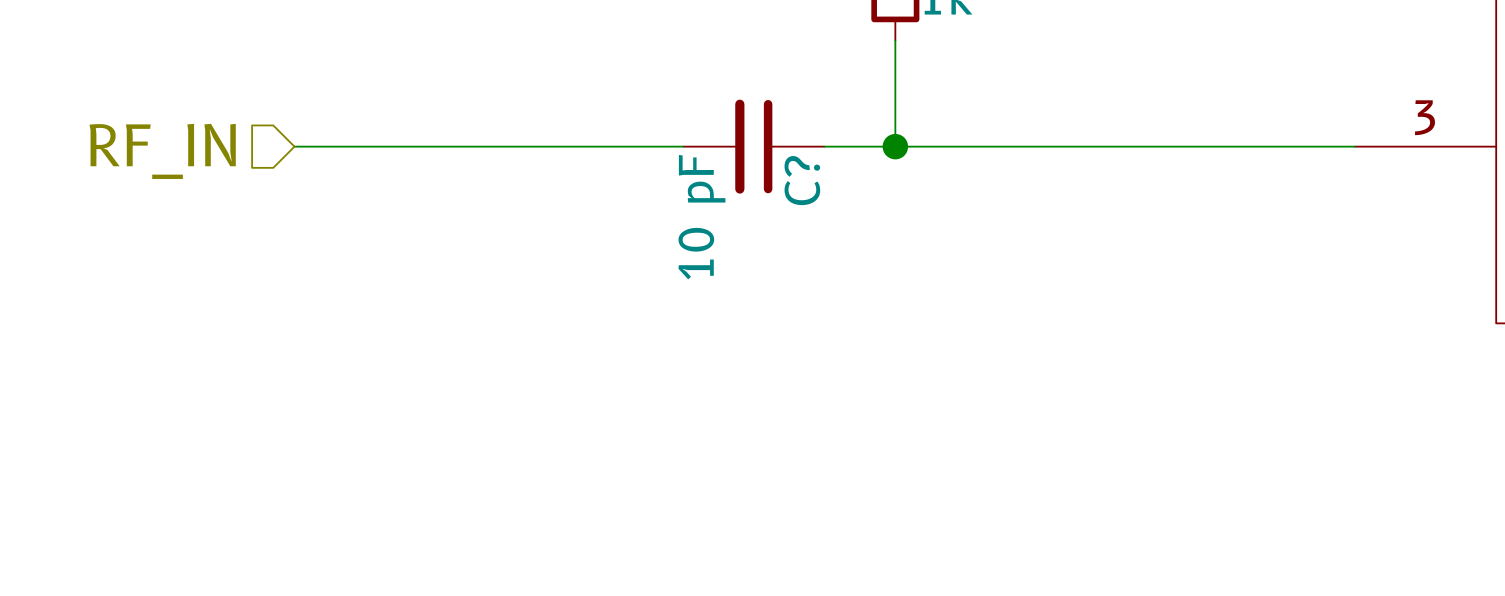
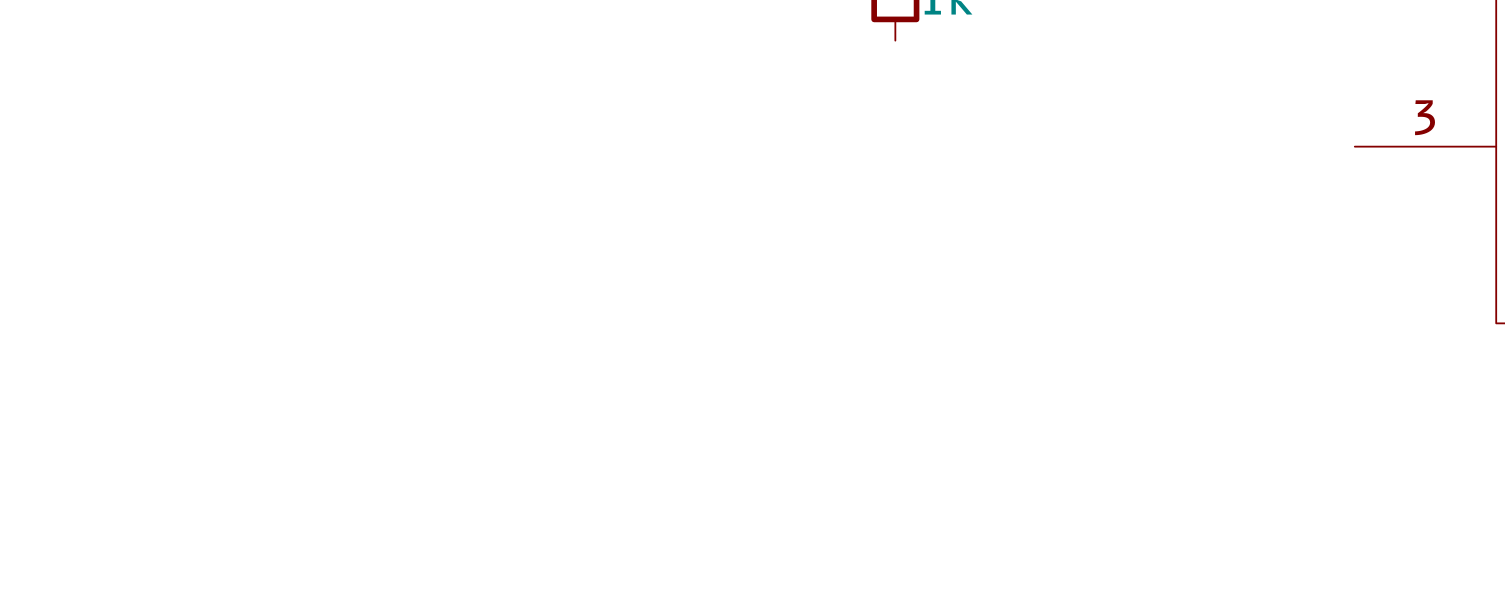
wire: (895, 40) (895, 146) -> none
wire: (294, 146) (683, 146) -> none
C?: 10 pF (753, 146) -> none
wire: (824, 146) (1354, 146) -> none
junction: (895, 146) -> none
hierarchical label: RF_IN (162, 151) -> none

